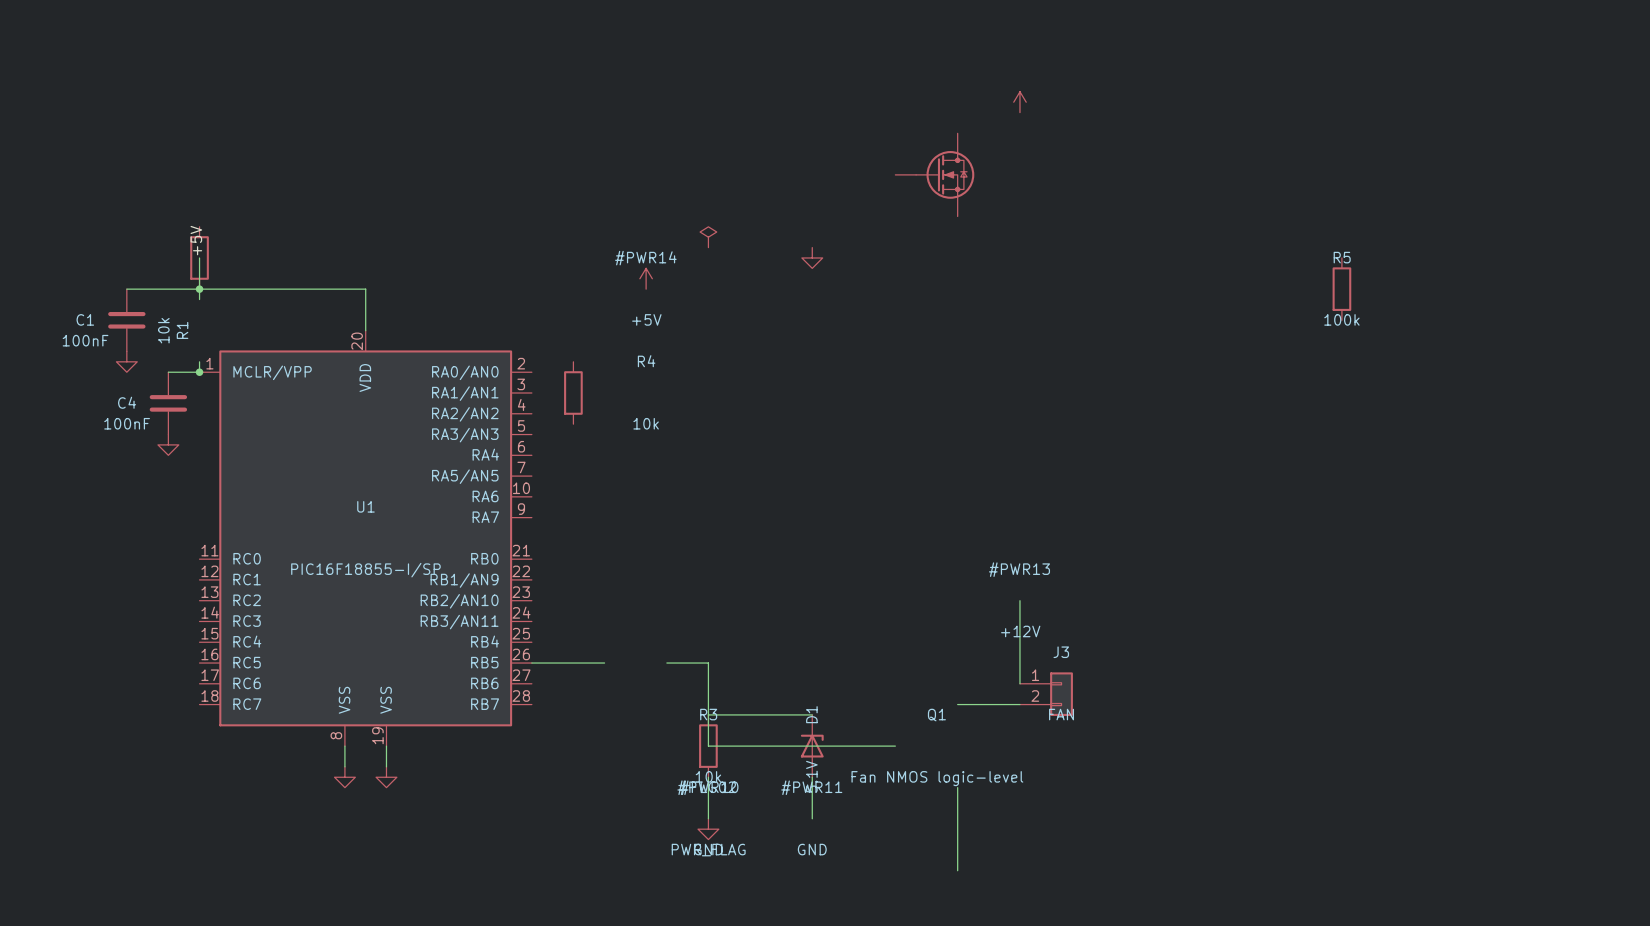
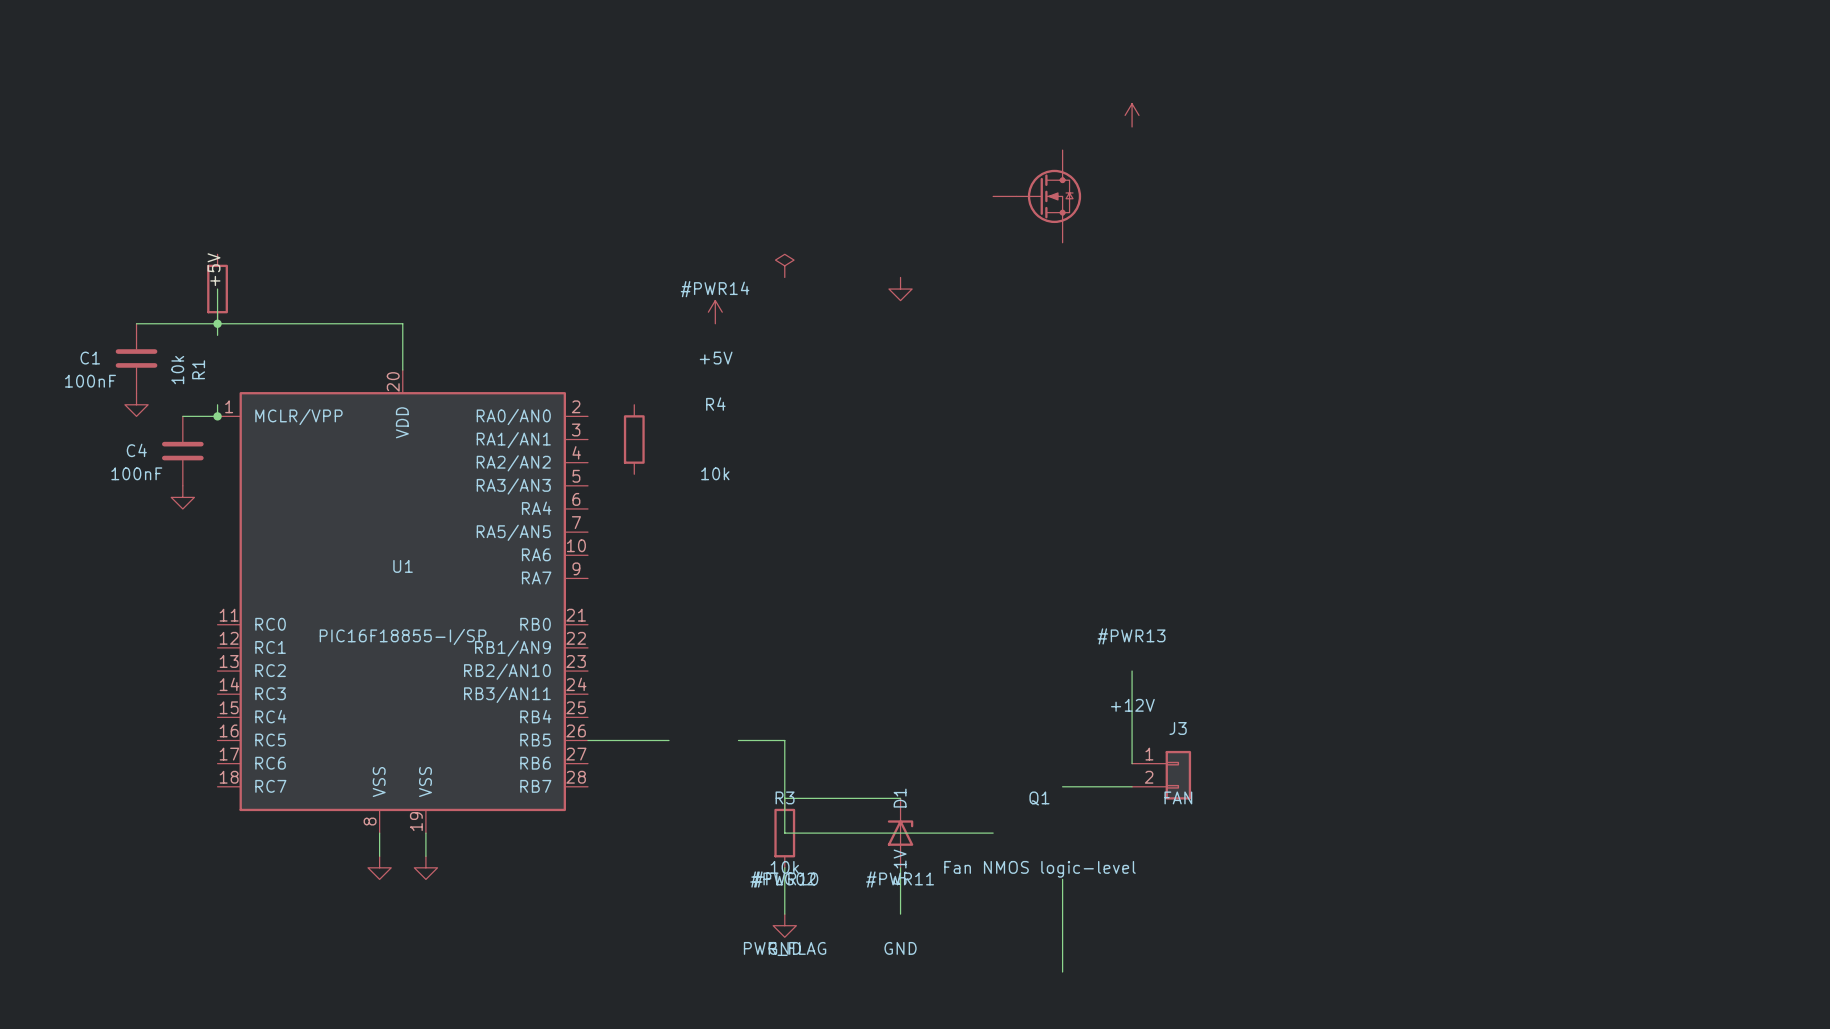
R5: 100k (1341, 289) -> none

